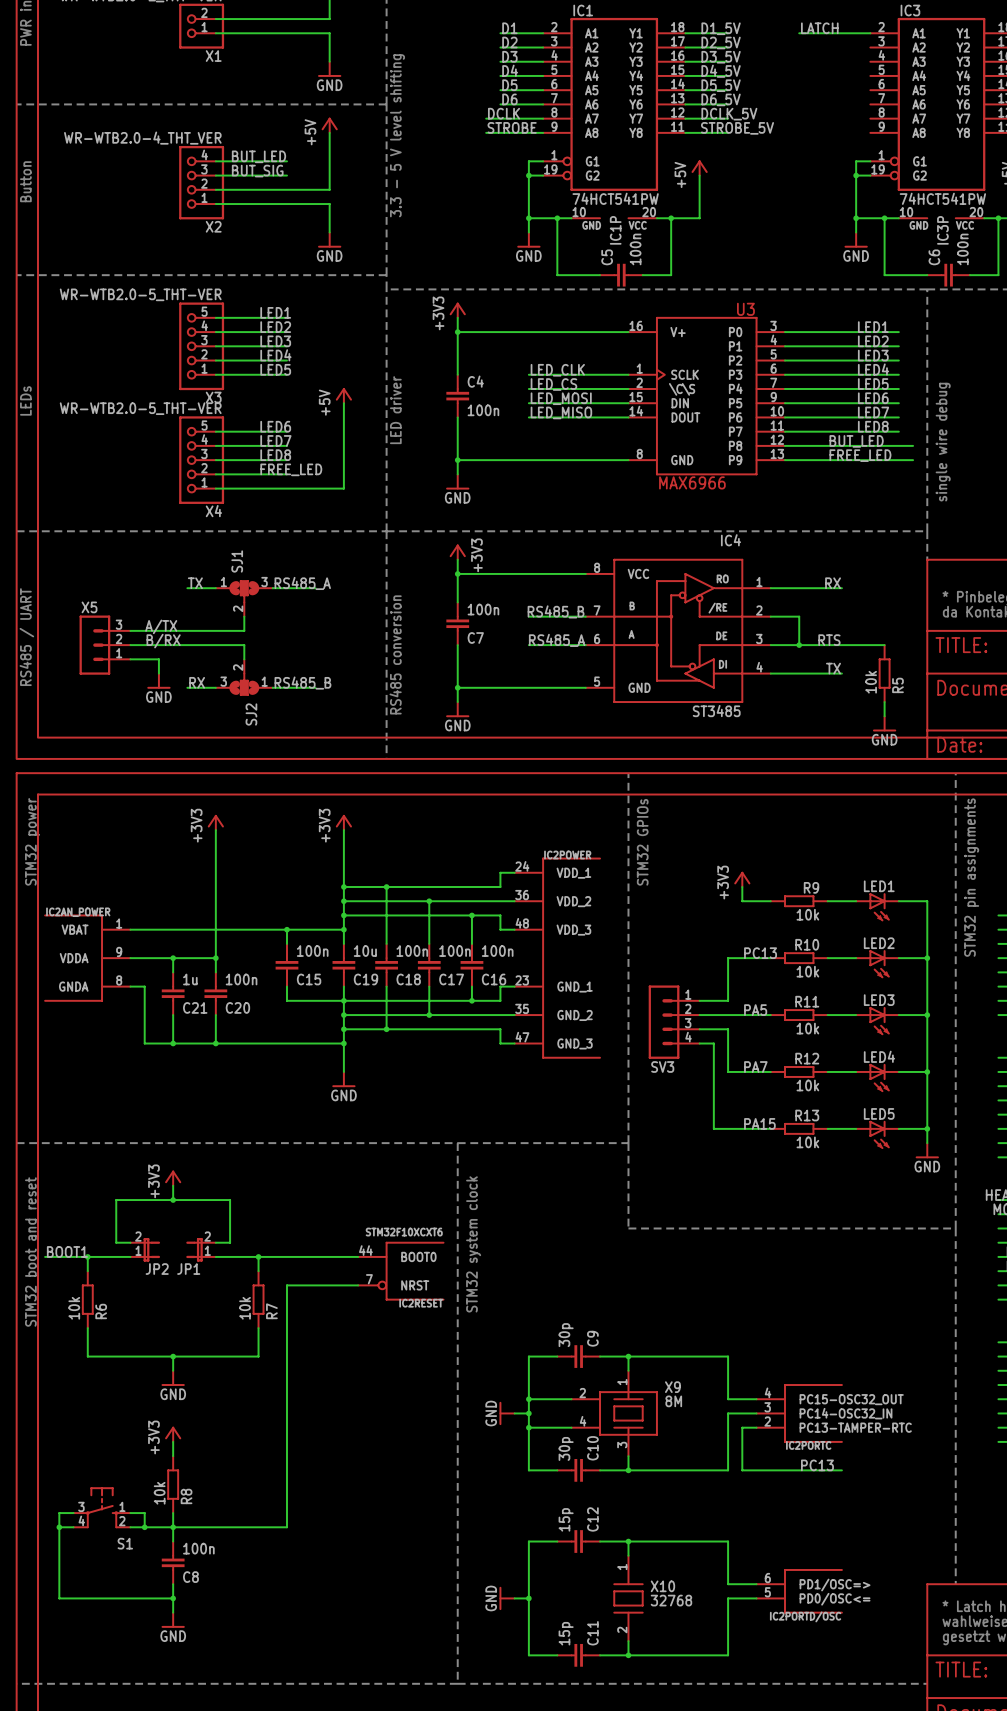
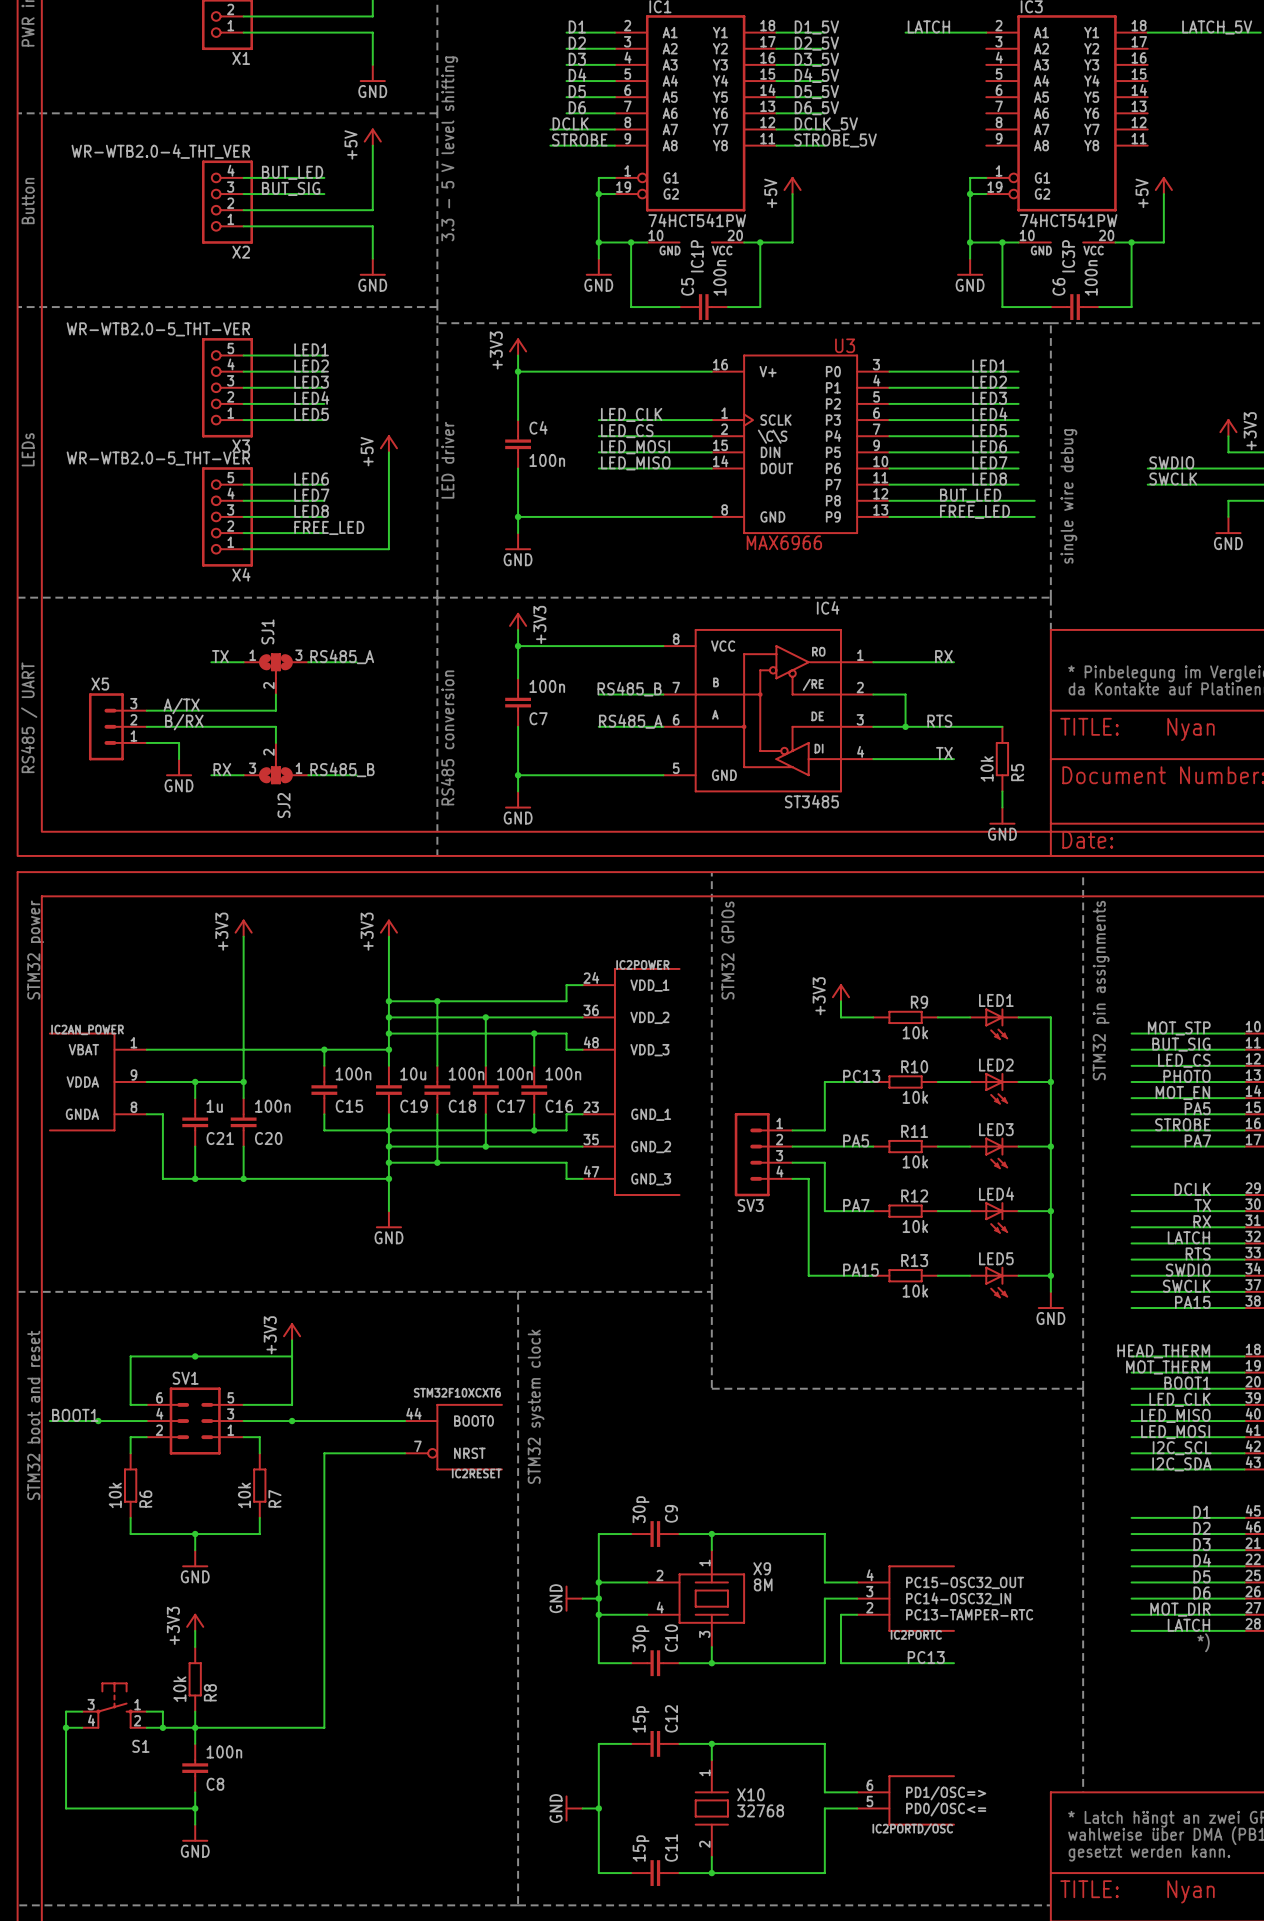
power symbol position: +3V3 (173, 1178) -> +3V3 (292, 1331)
wire: (173, 1185) (173, 1200) -> none
wire: (230, 1200) (230, 1242) -> (292, 1340) (292, 1404) (259, 1404)
wire: none -> (259, 1356) (292, 1356)
JP2: (145, 1249) -> none
JP1: (201, 1249) -> none
wire: (87, 1256) (87, 1271) -> none
SV1: none -> (195, 1421)
wire: (258, 1256) (258, 1271) -> none
wire: none -> (146, 1437) (130, 1437) (130, 1453)
wire: none -> (243, 1437) (259, 1437) (259, 1453)
R6 position: (87, 1299) -> (130, 1485)
R7 position: (258, 1299) -> (259, 1485)
wire: (87, 1328) (87, 1356) (116, 1356) -> (130, 1517) (130, 1534)
wire: (258, 1328) (258, 1356) (230, 1356) -> (259, 1517) (259, 1534)

